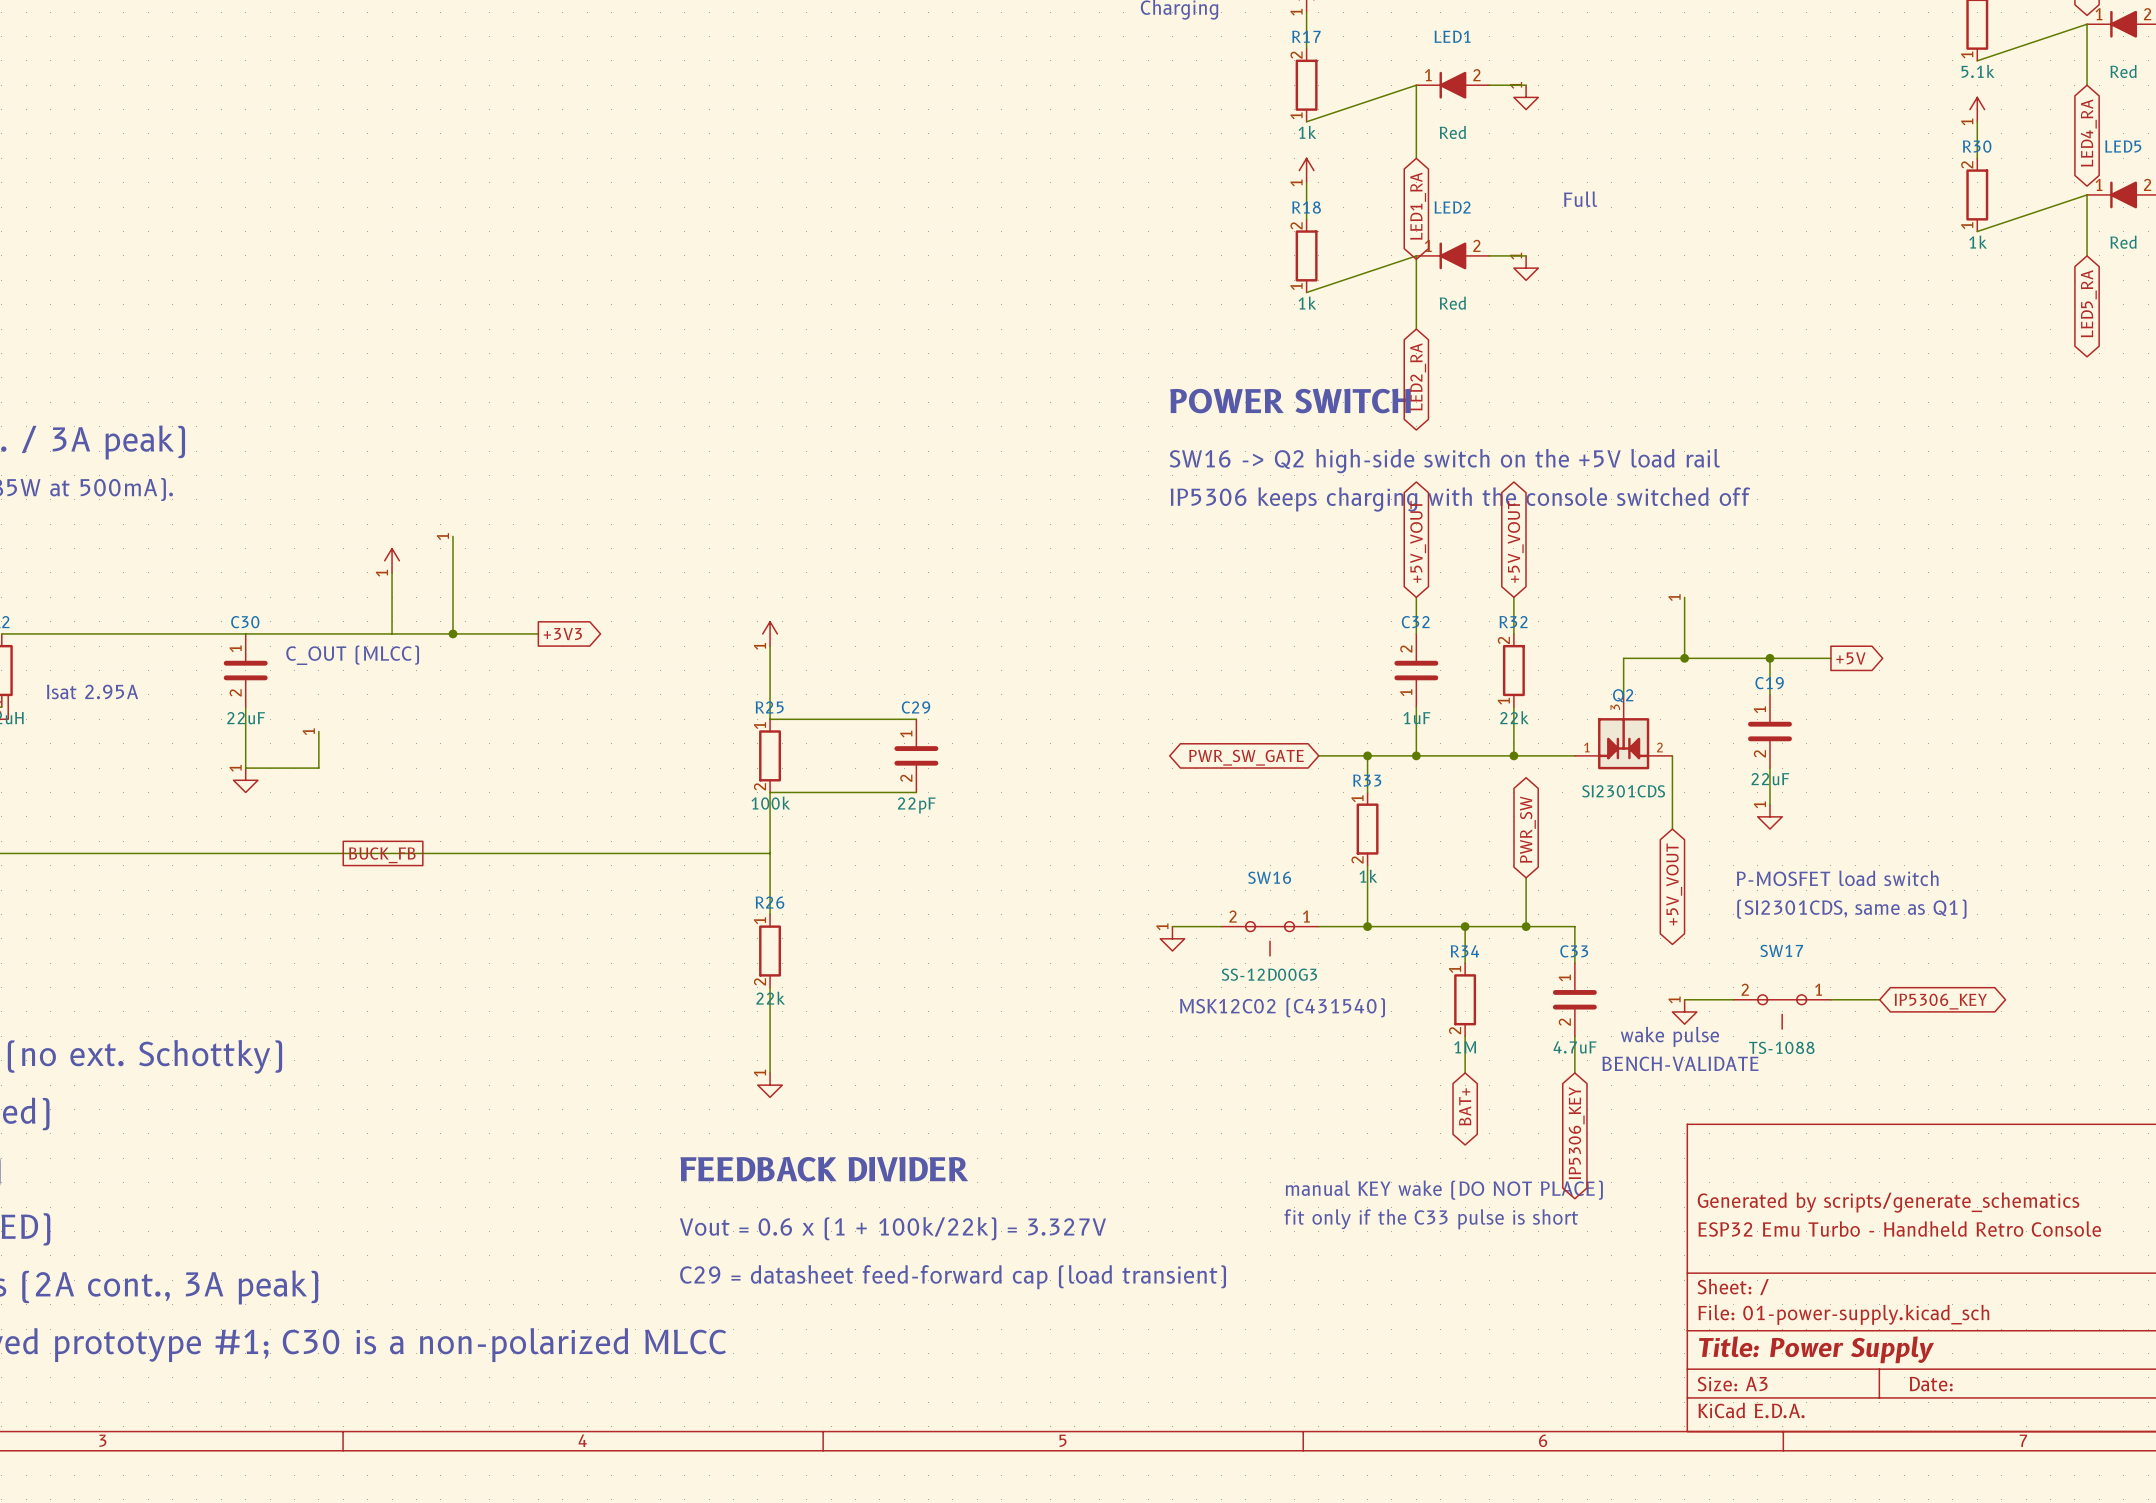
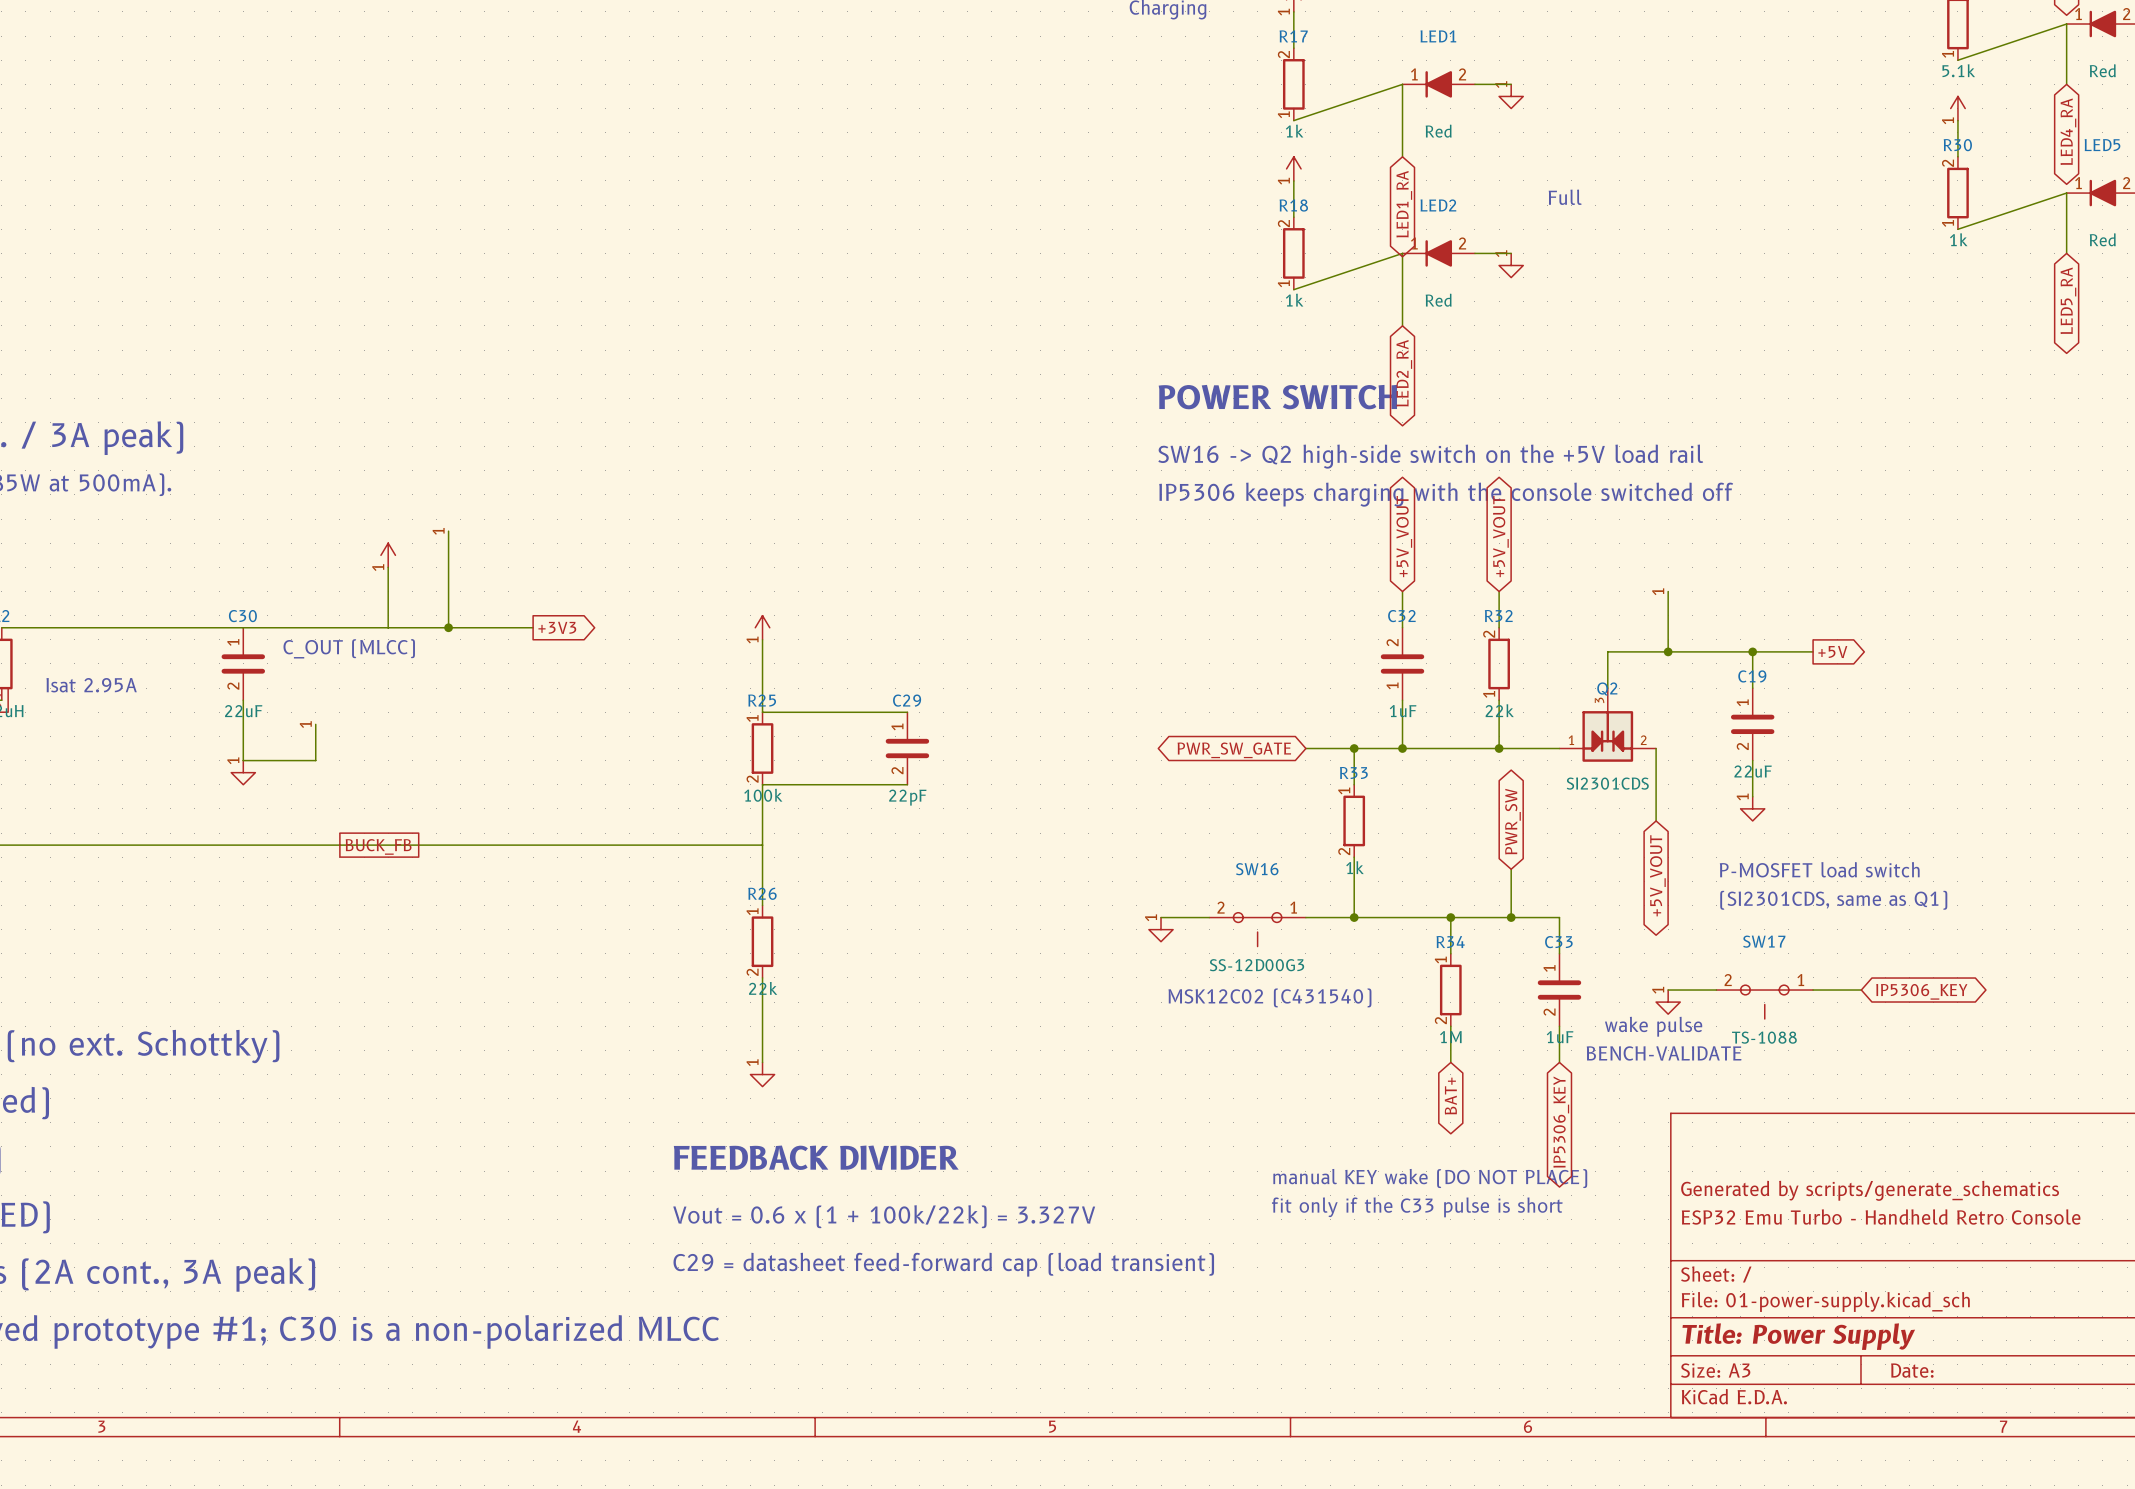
C33 value: 4.7uF (1575, 1047) -> 1uF (1560, 1037)

